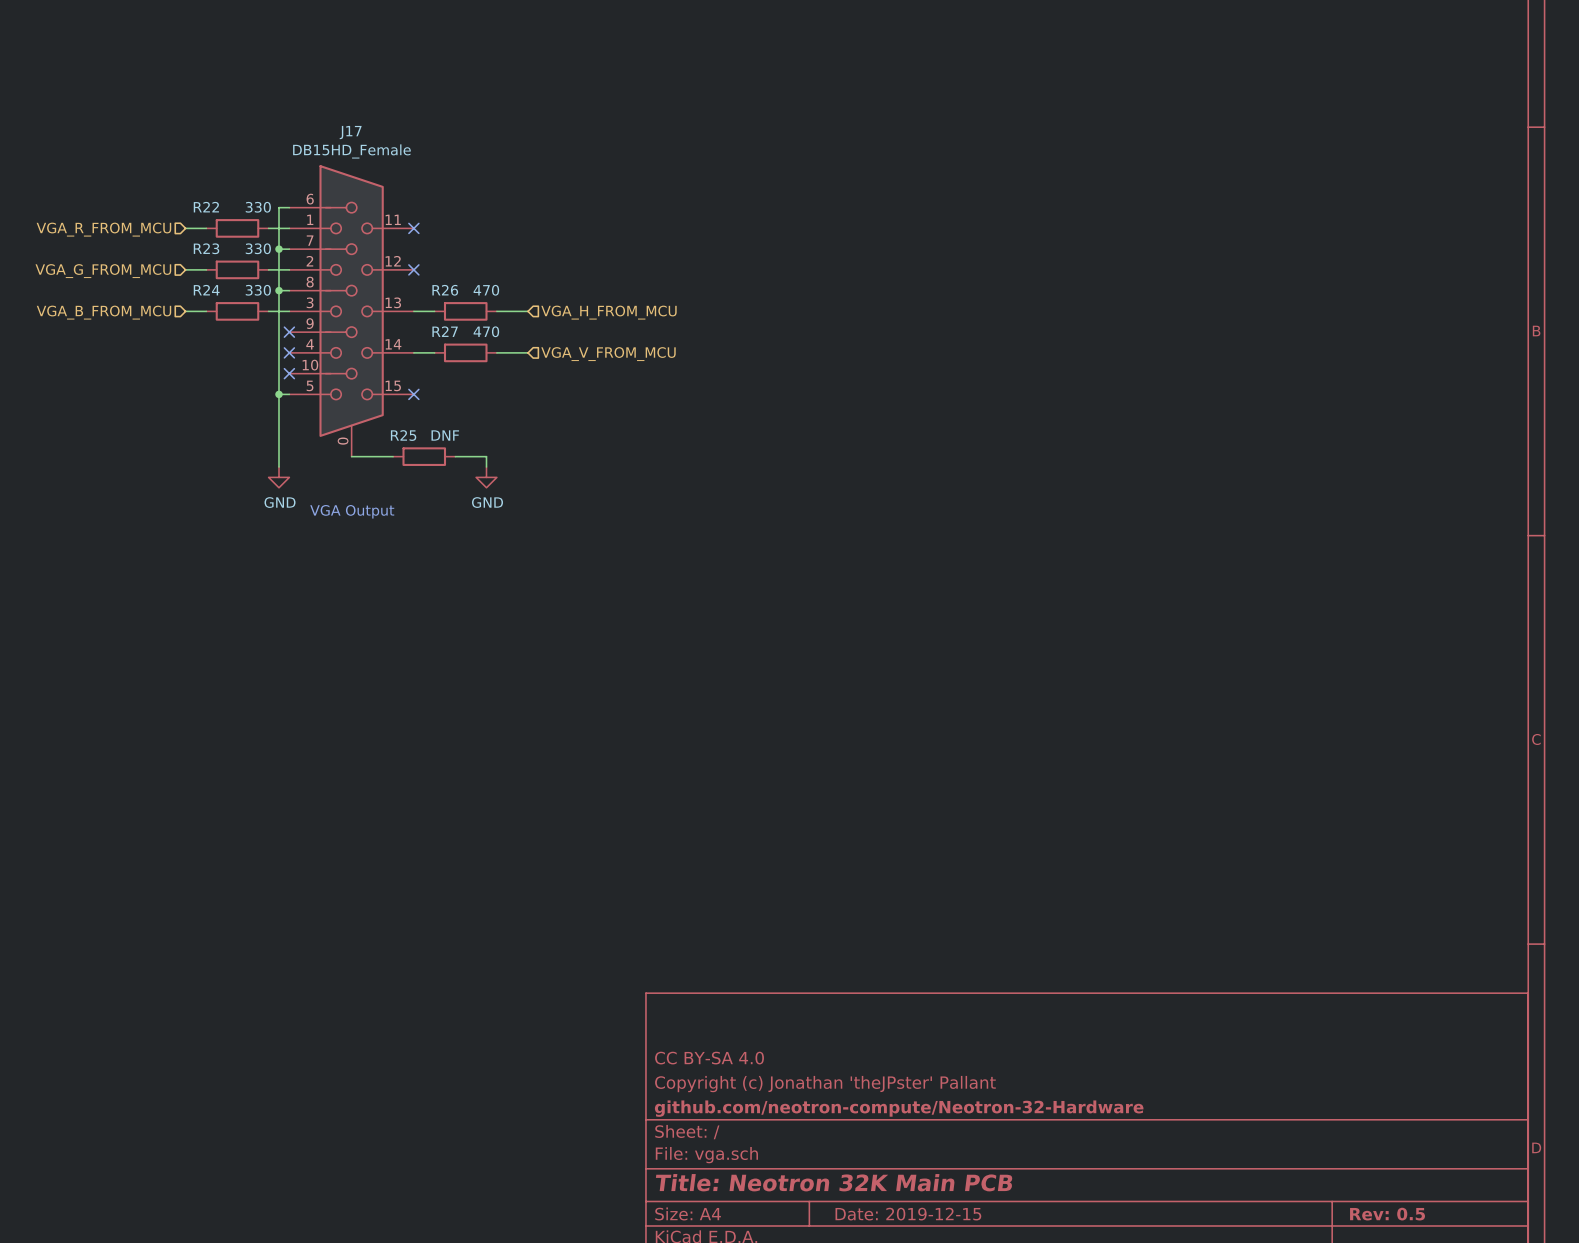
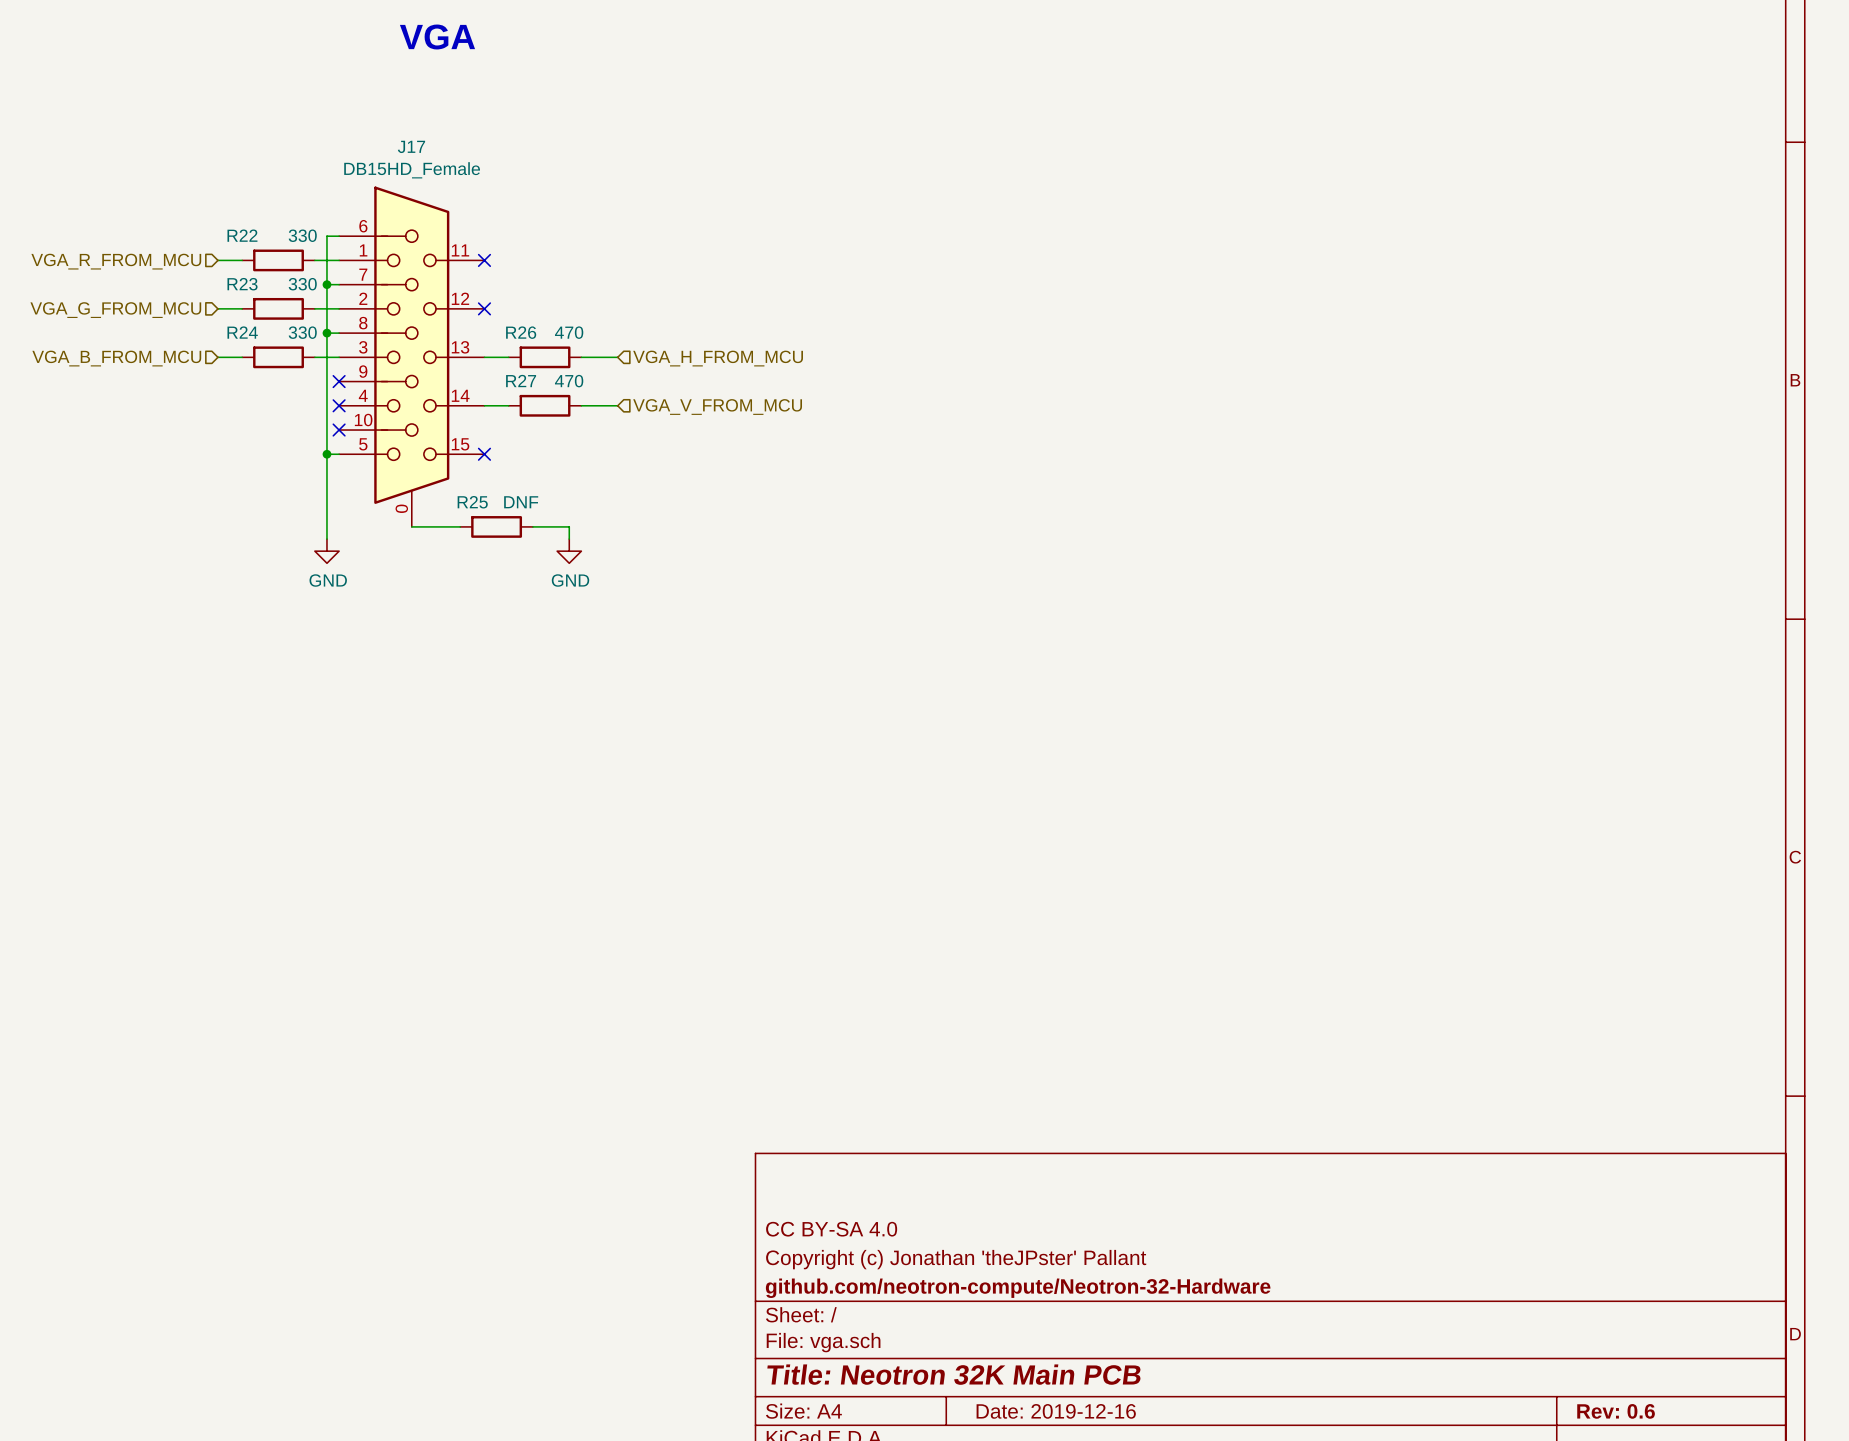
text: none -> VGA (437, 37)
text: VGA Output (352, 511) -> none
title block: Date: 2019-12-15 (908, 1214) -> Date: 2019-12-16 (1056, 1411)
title block: Rev: 0.5 (1387, 1214) -> Rev: 0.6 (1616, 1411)

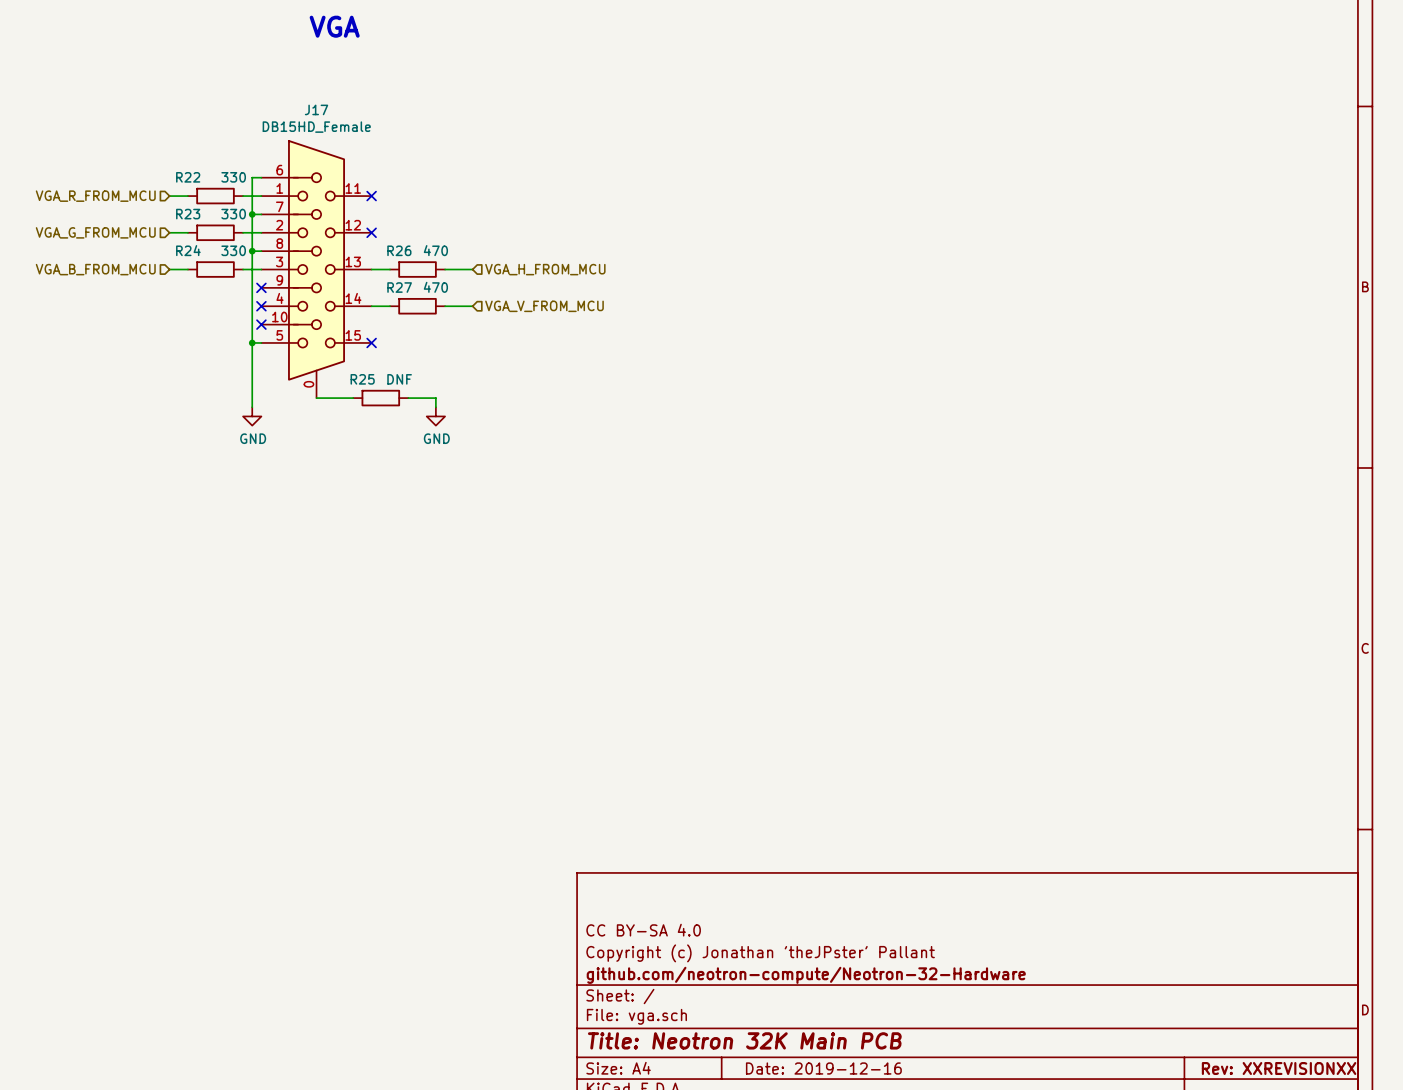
title block: Rev: 0.6 (1616, 1411) -> Rev: XXREVISIONXX (1279, 1068)

